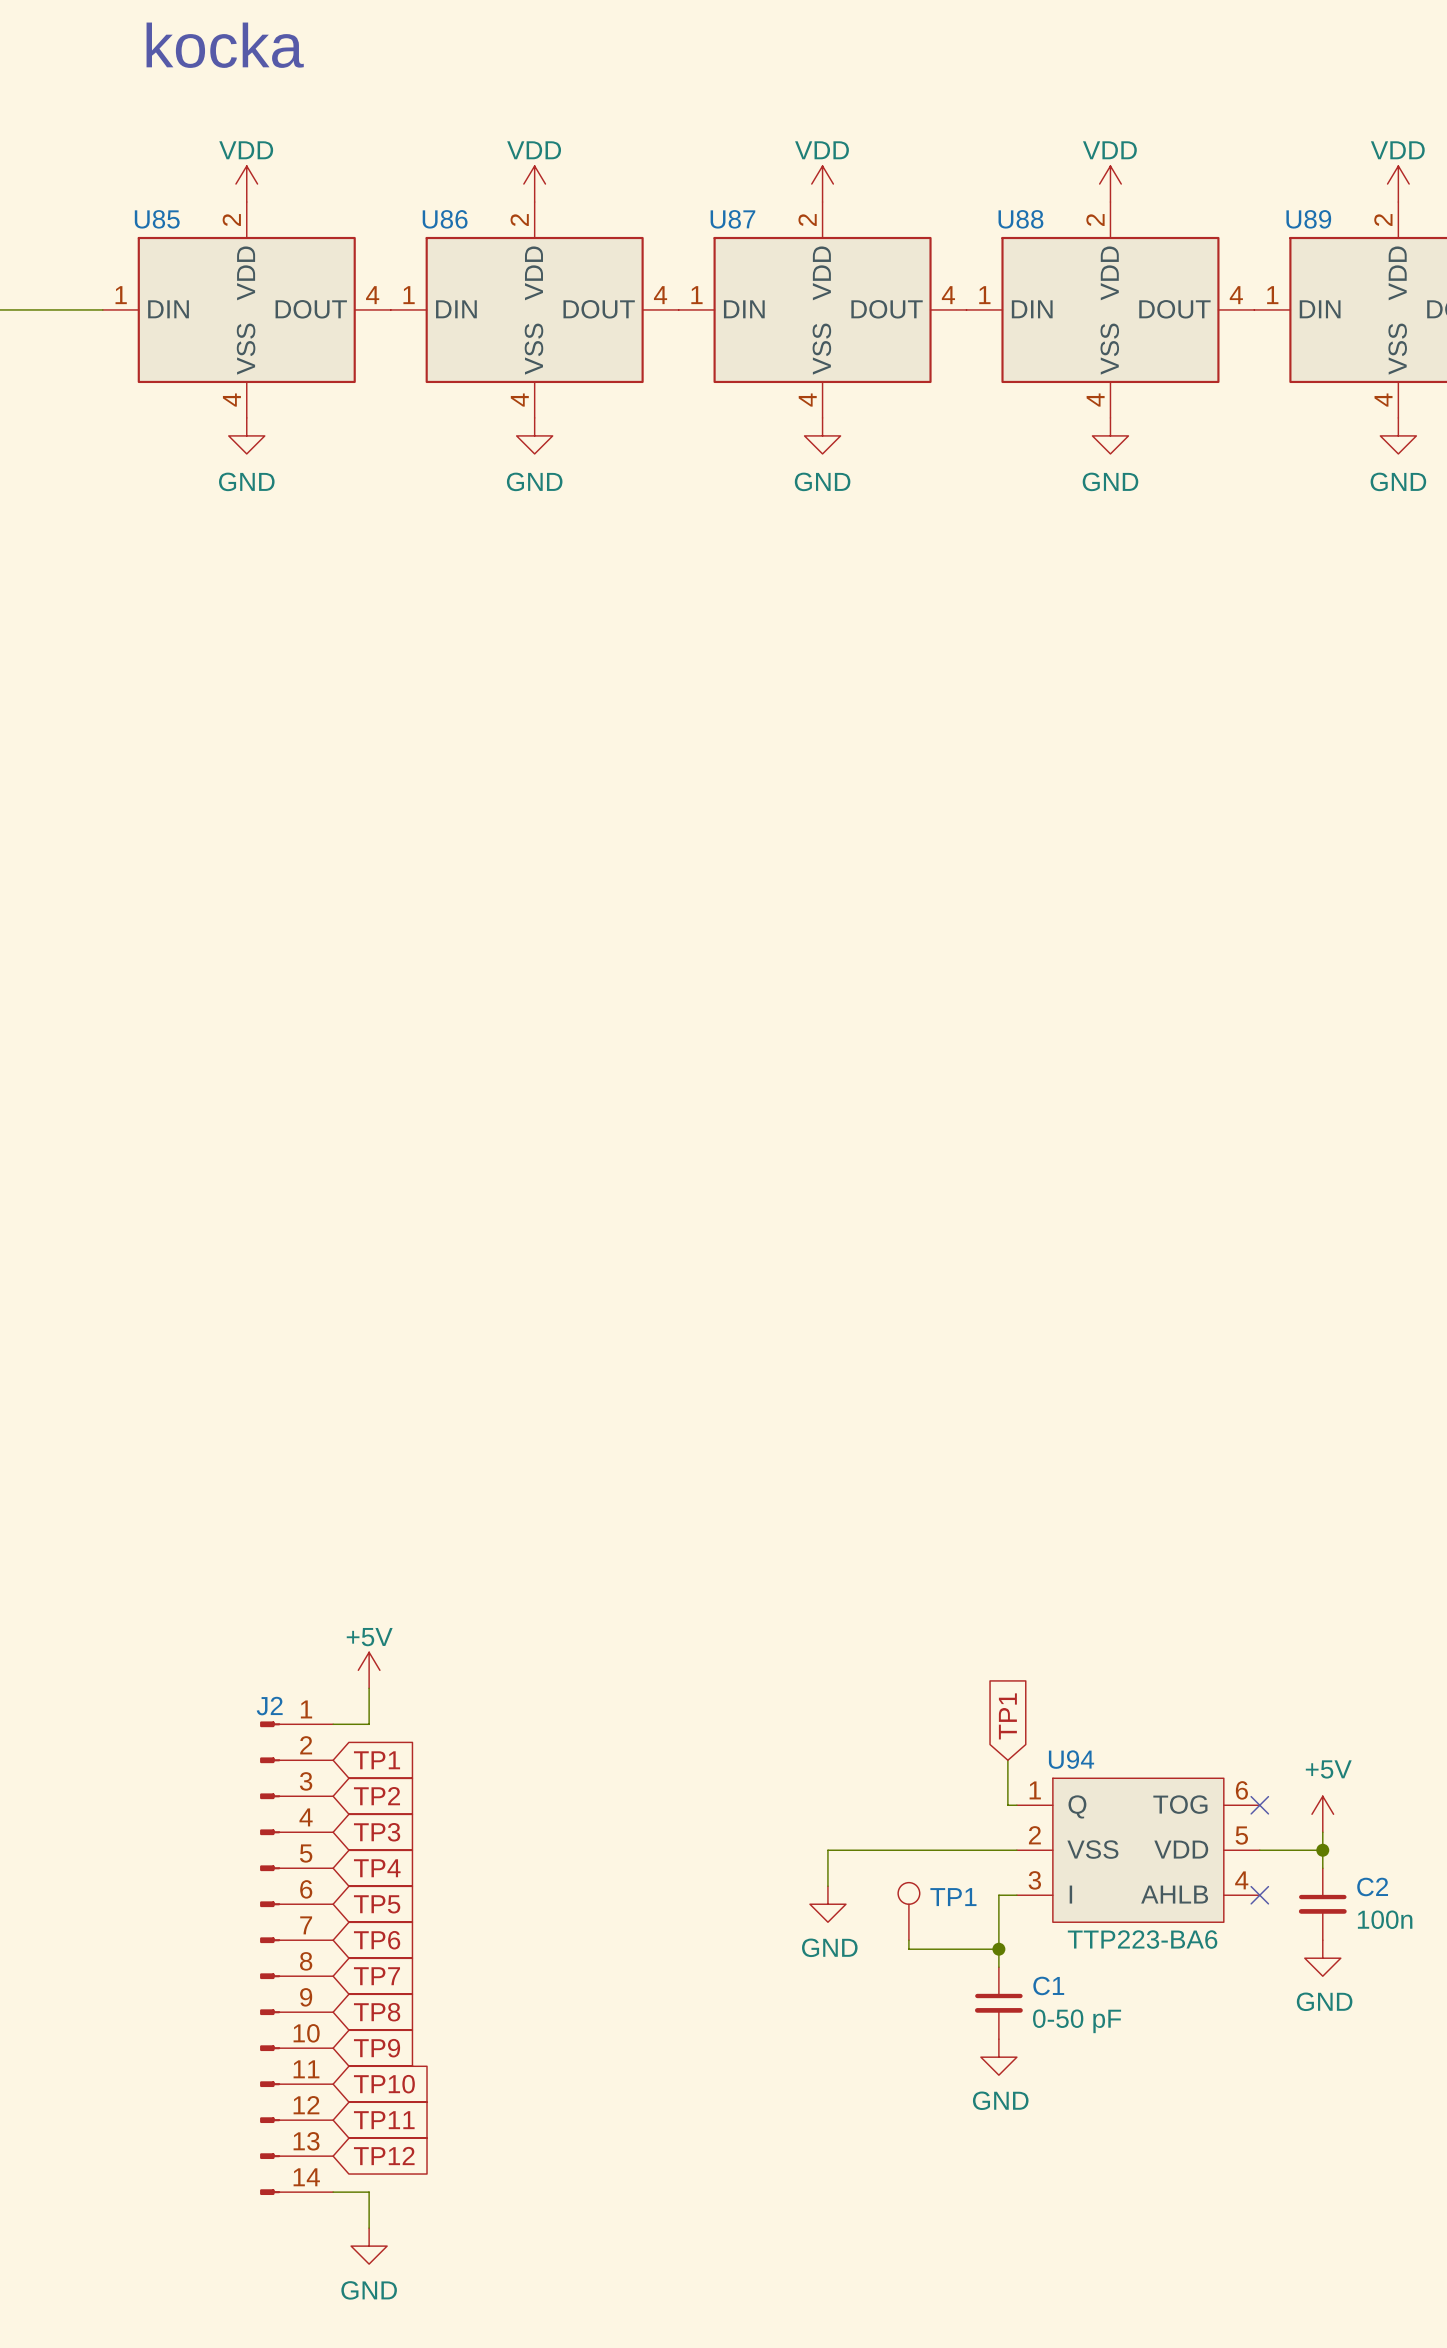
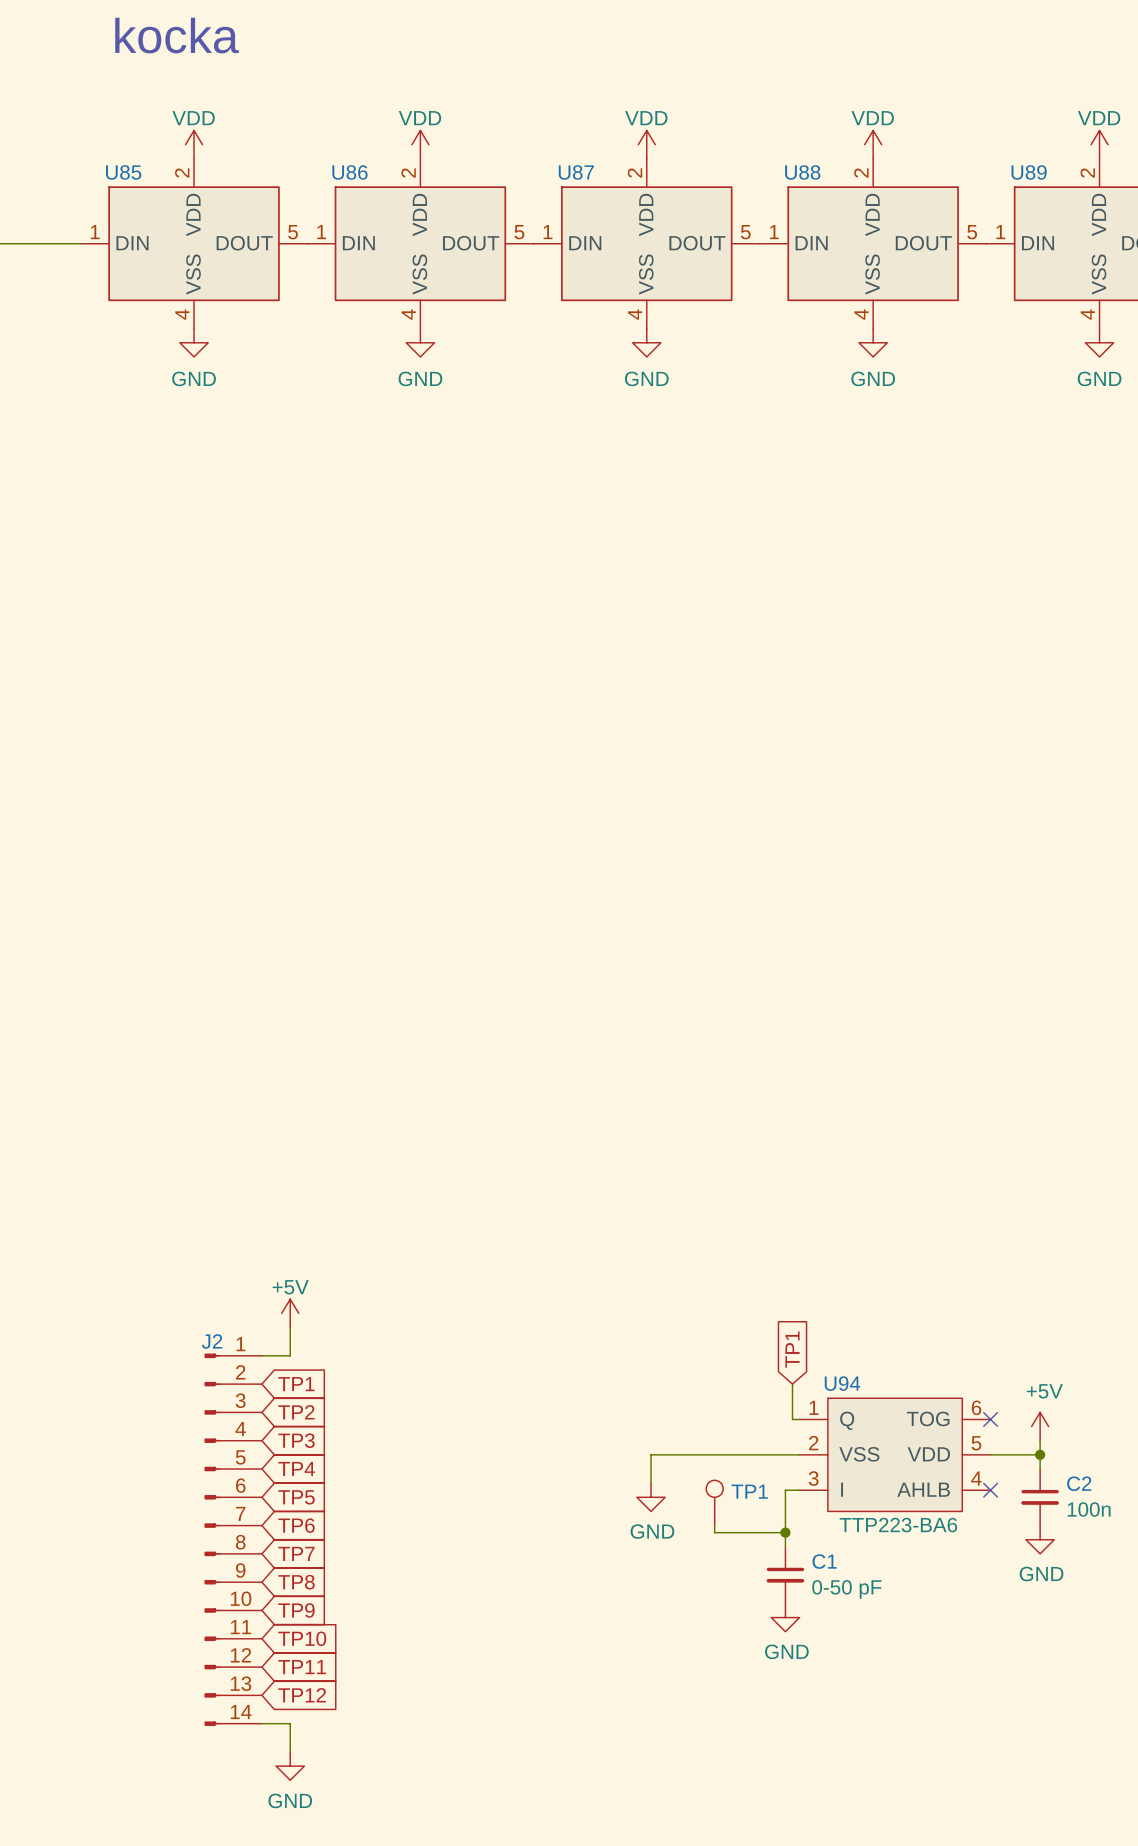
U85 pin number: 4 (372, 295) -> 5 (293, 232)
U86 pin number: 4 (660, 295) -> 5 (519, 232)
U87 pin number: 4 (948, 295) -> 5 (745, 232)
U88 pin number: 4 (1236, 295) -> 5 (972, 232)

